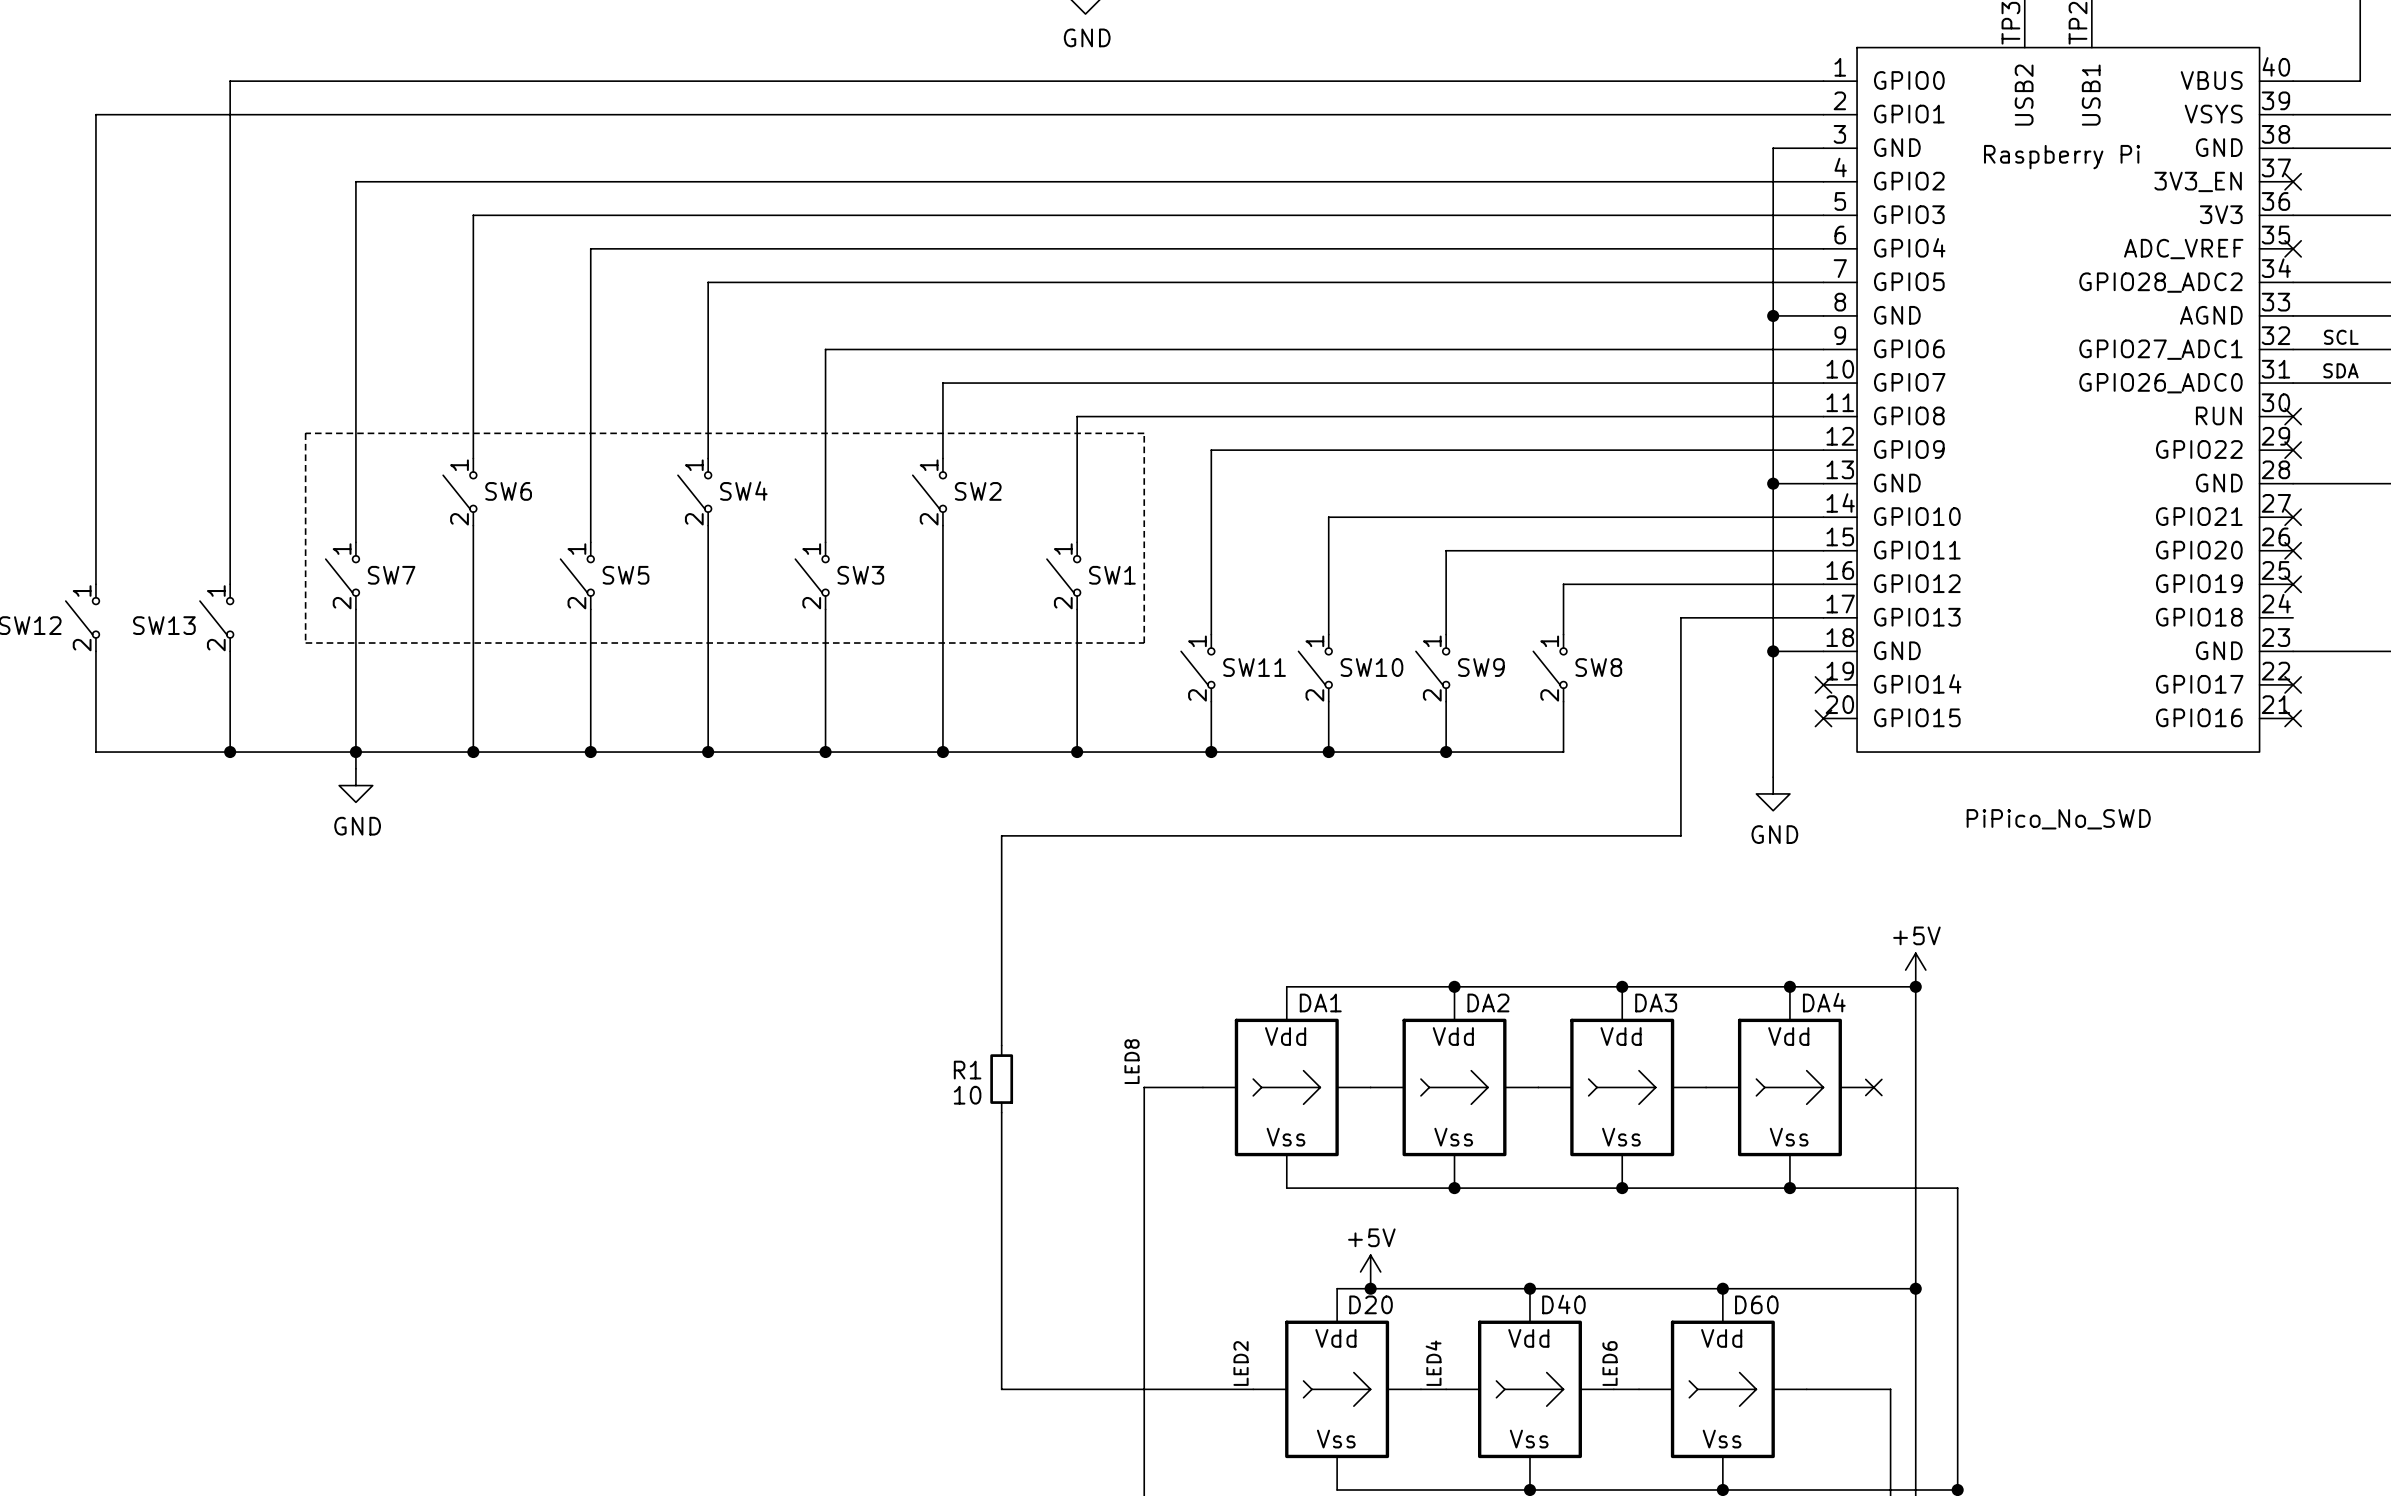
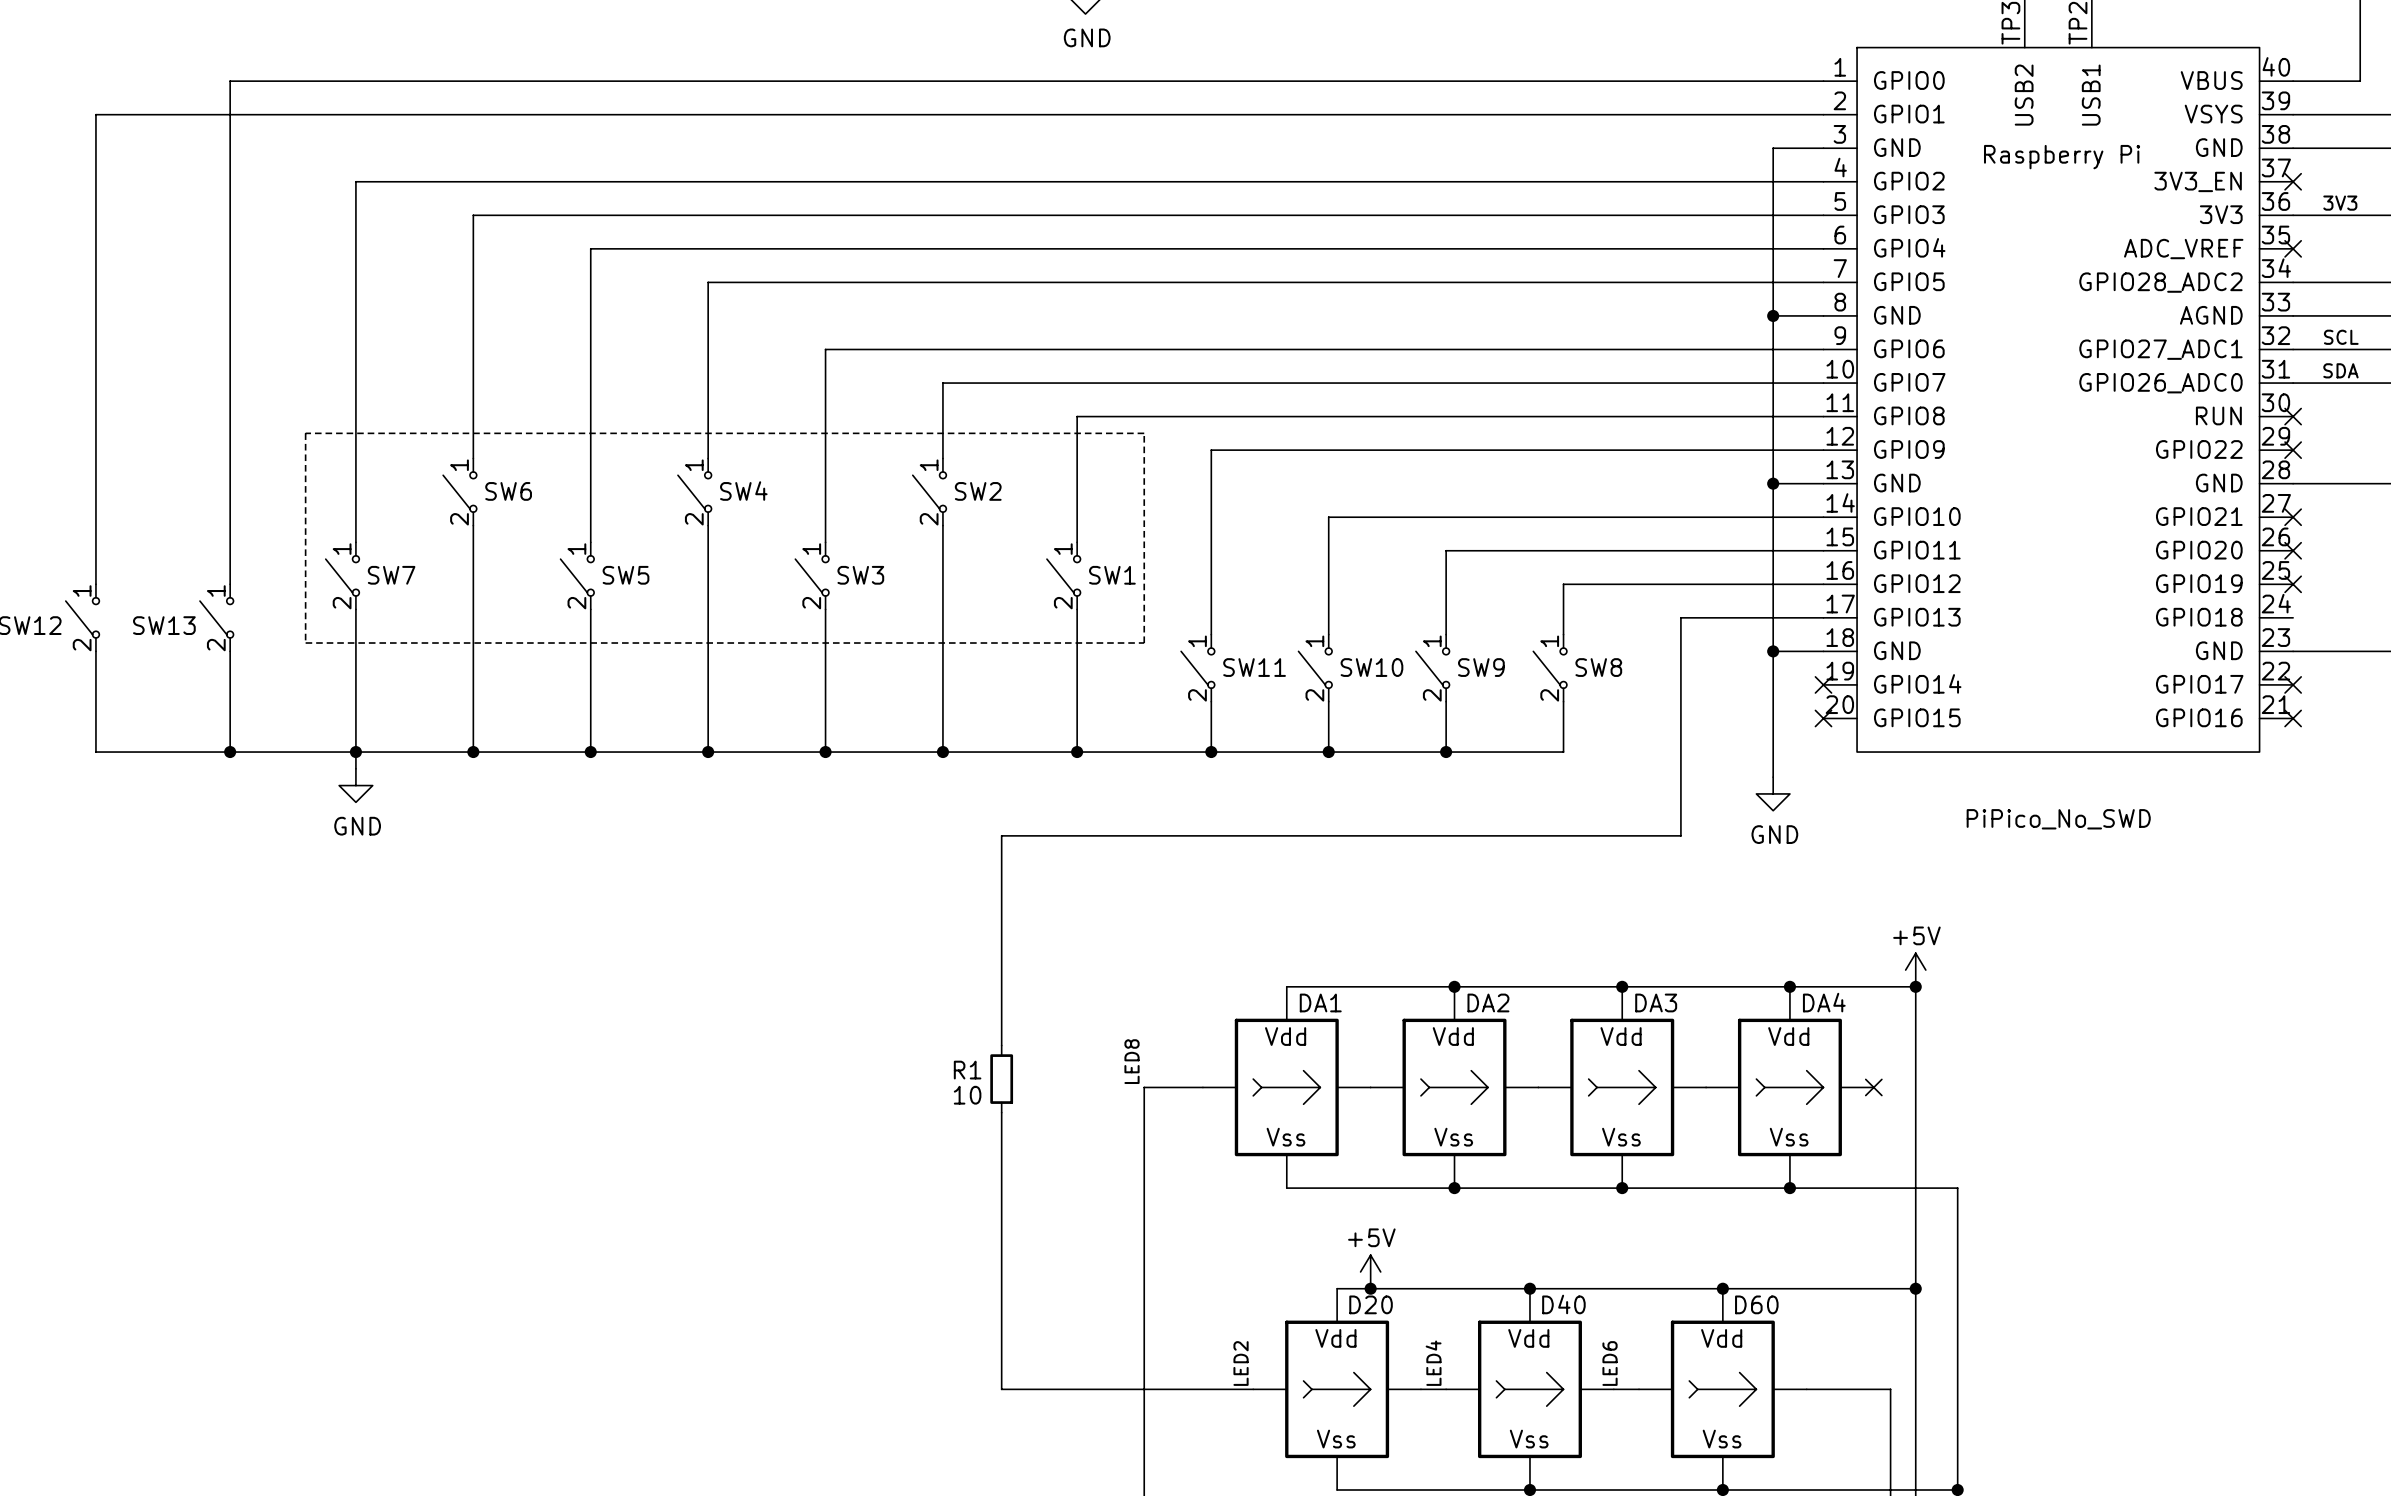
label: none -> 3V3 (2340, 203)

